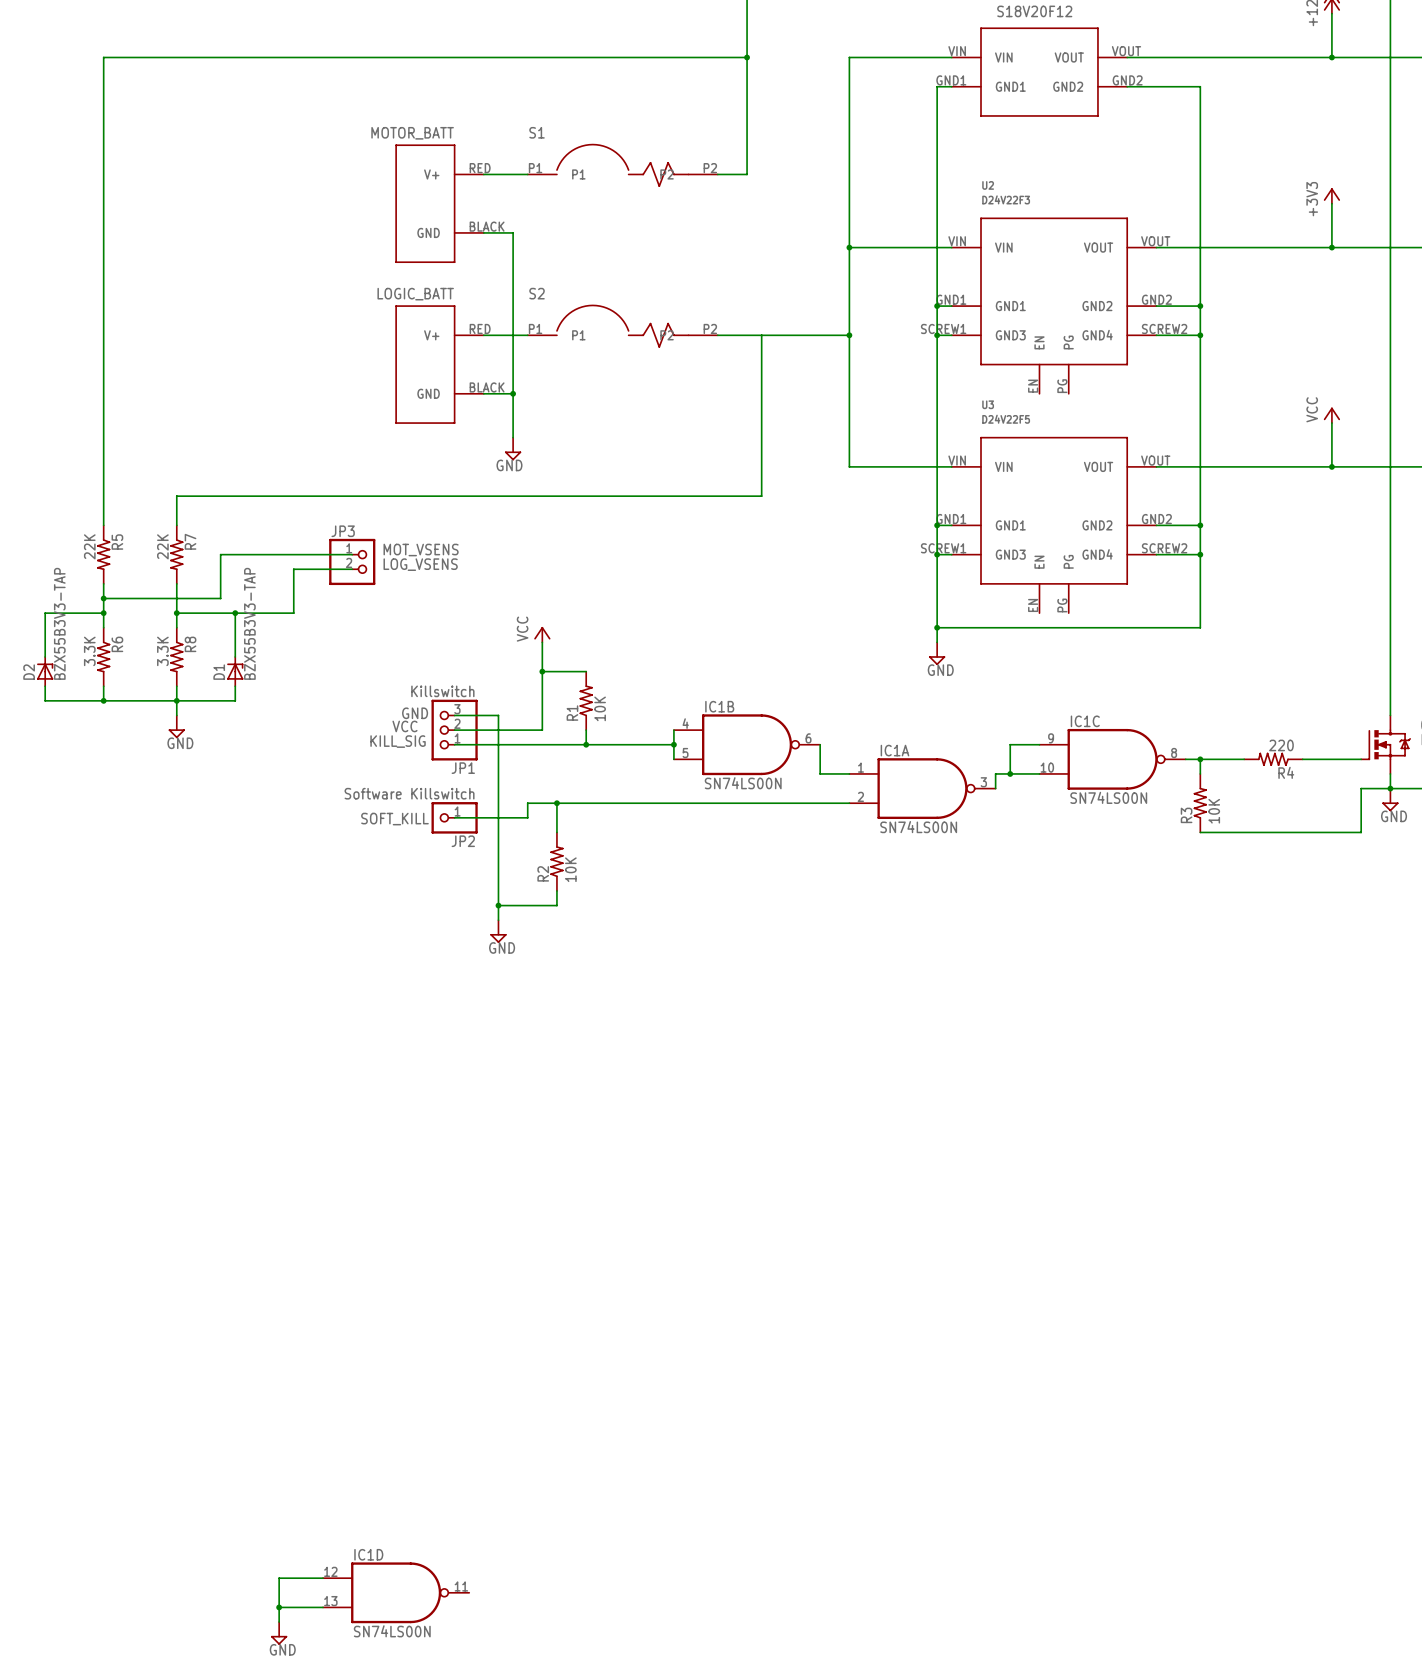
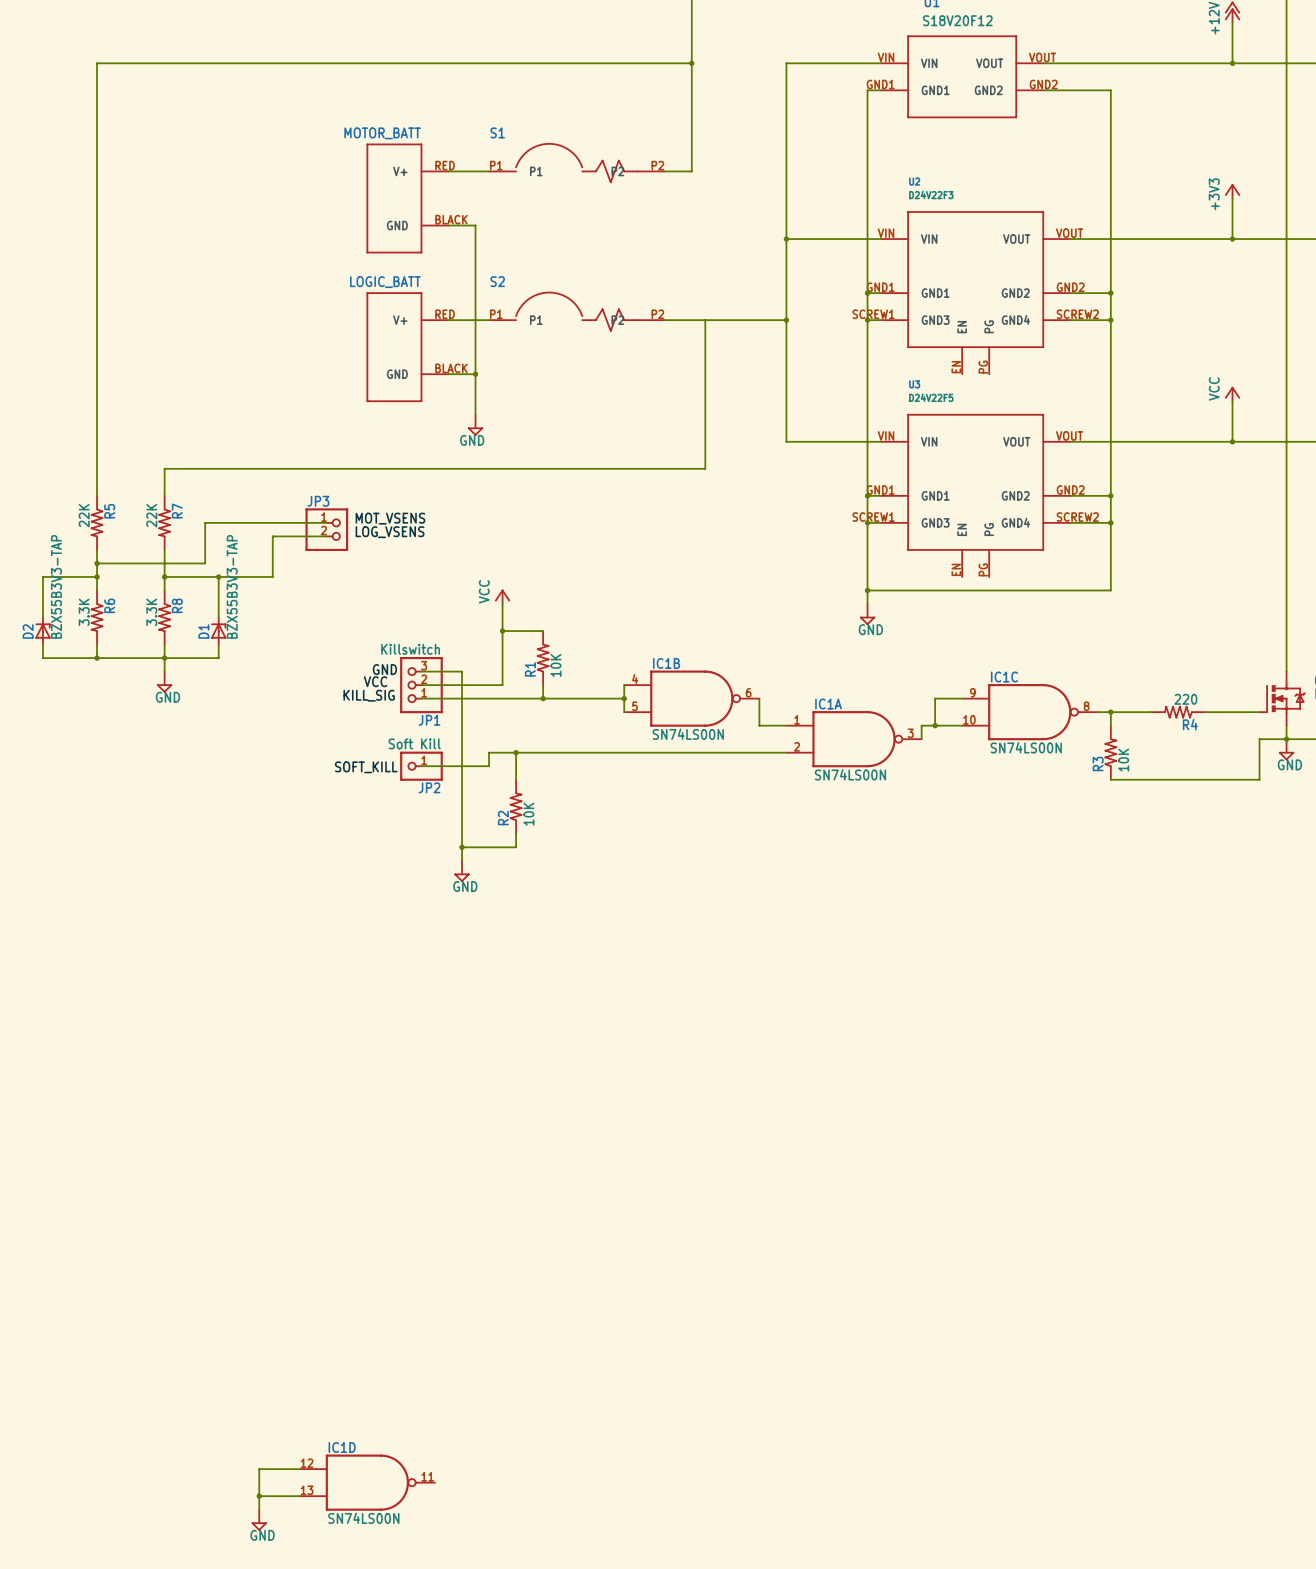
JP2 value: Software Killswitch (409, 793) -> Soft Kill (414, 743)

